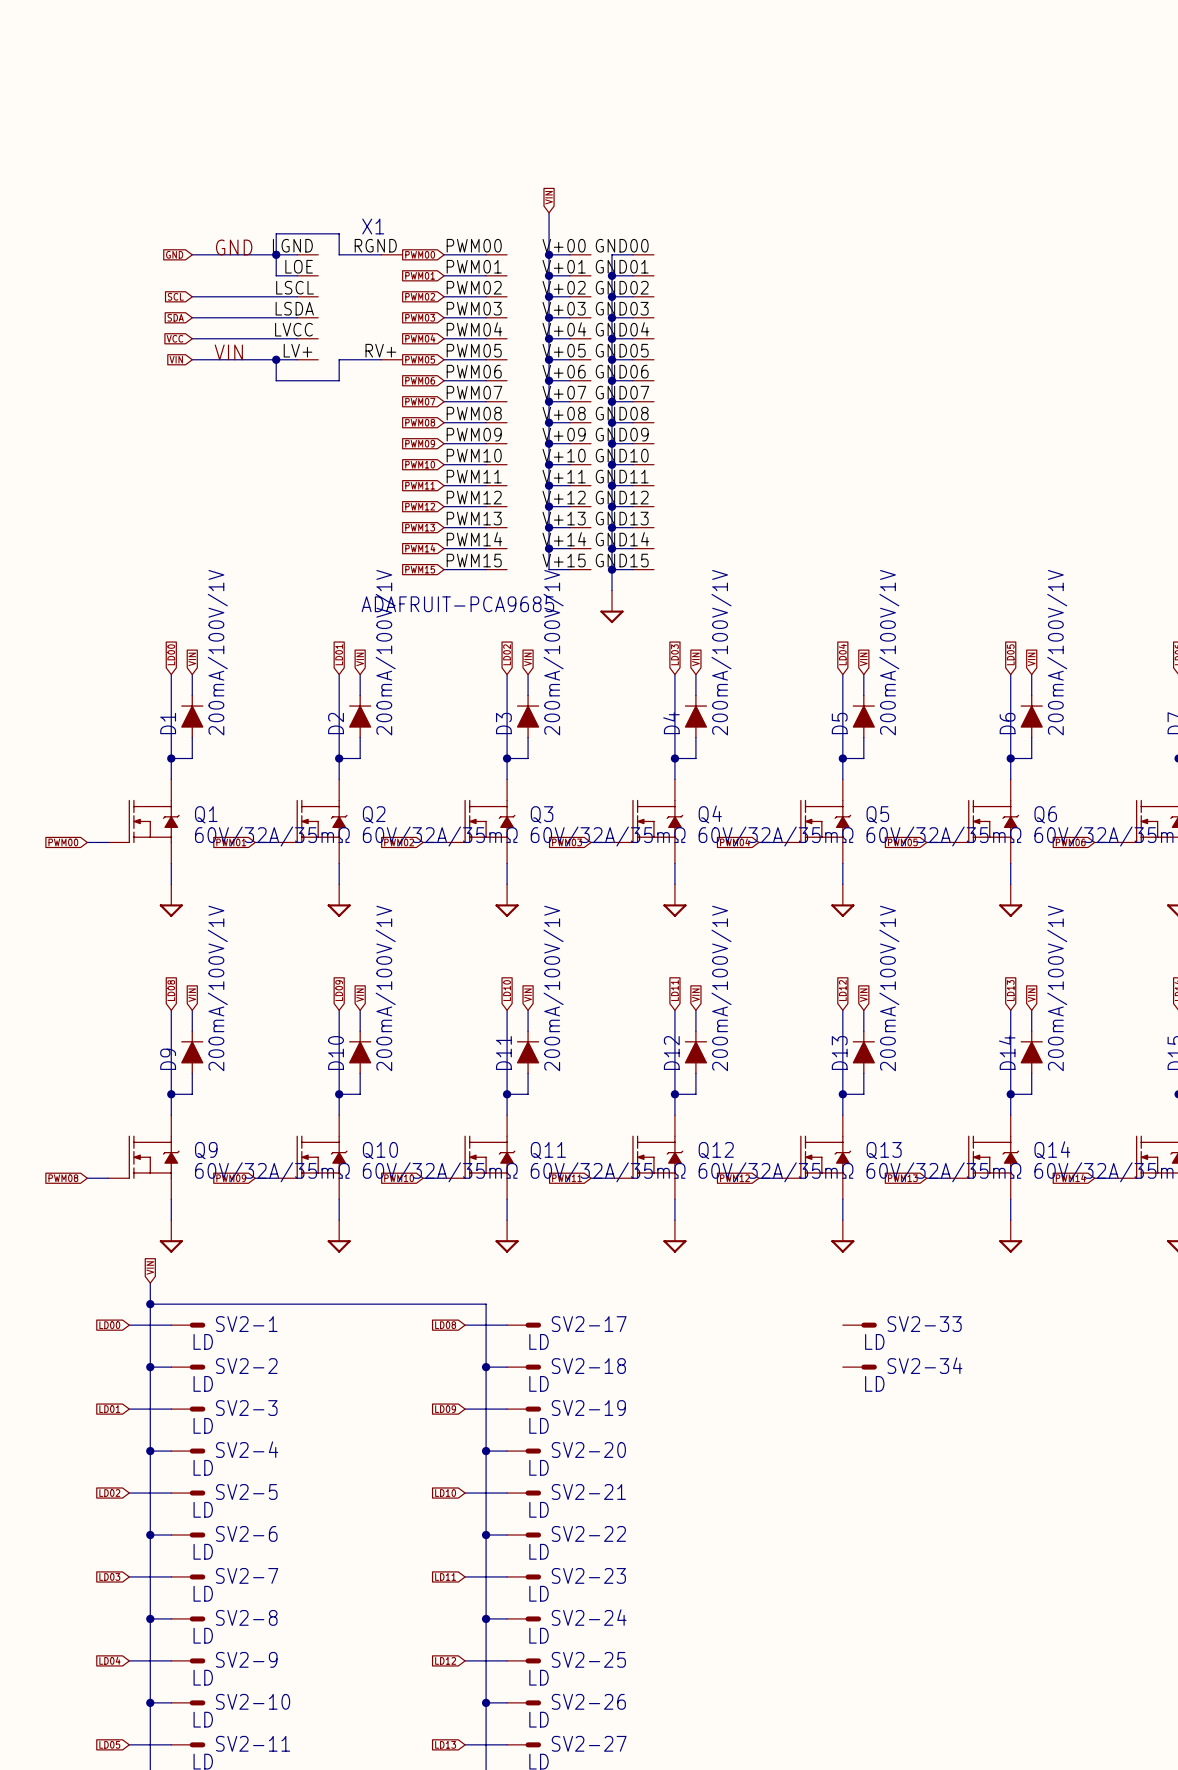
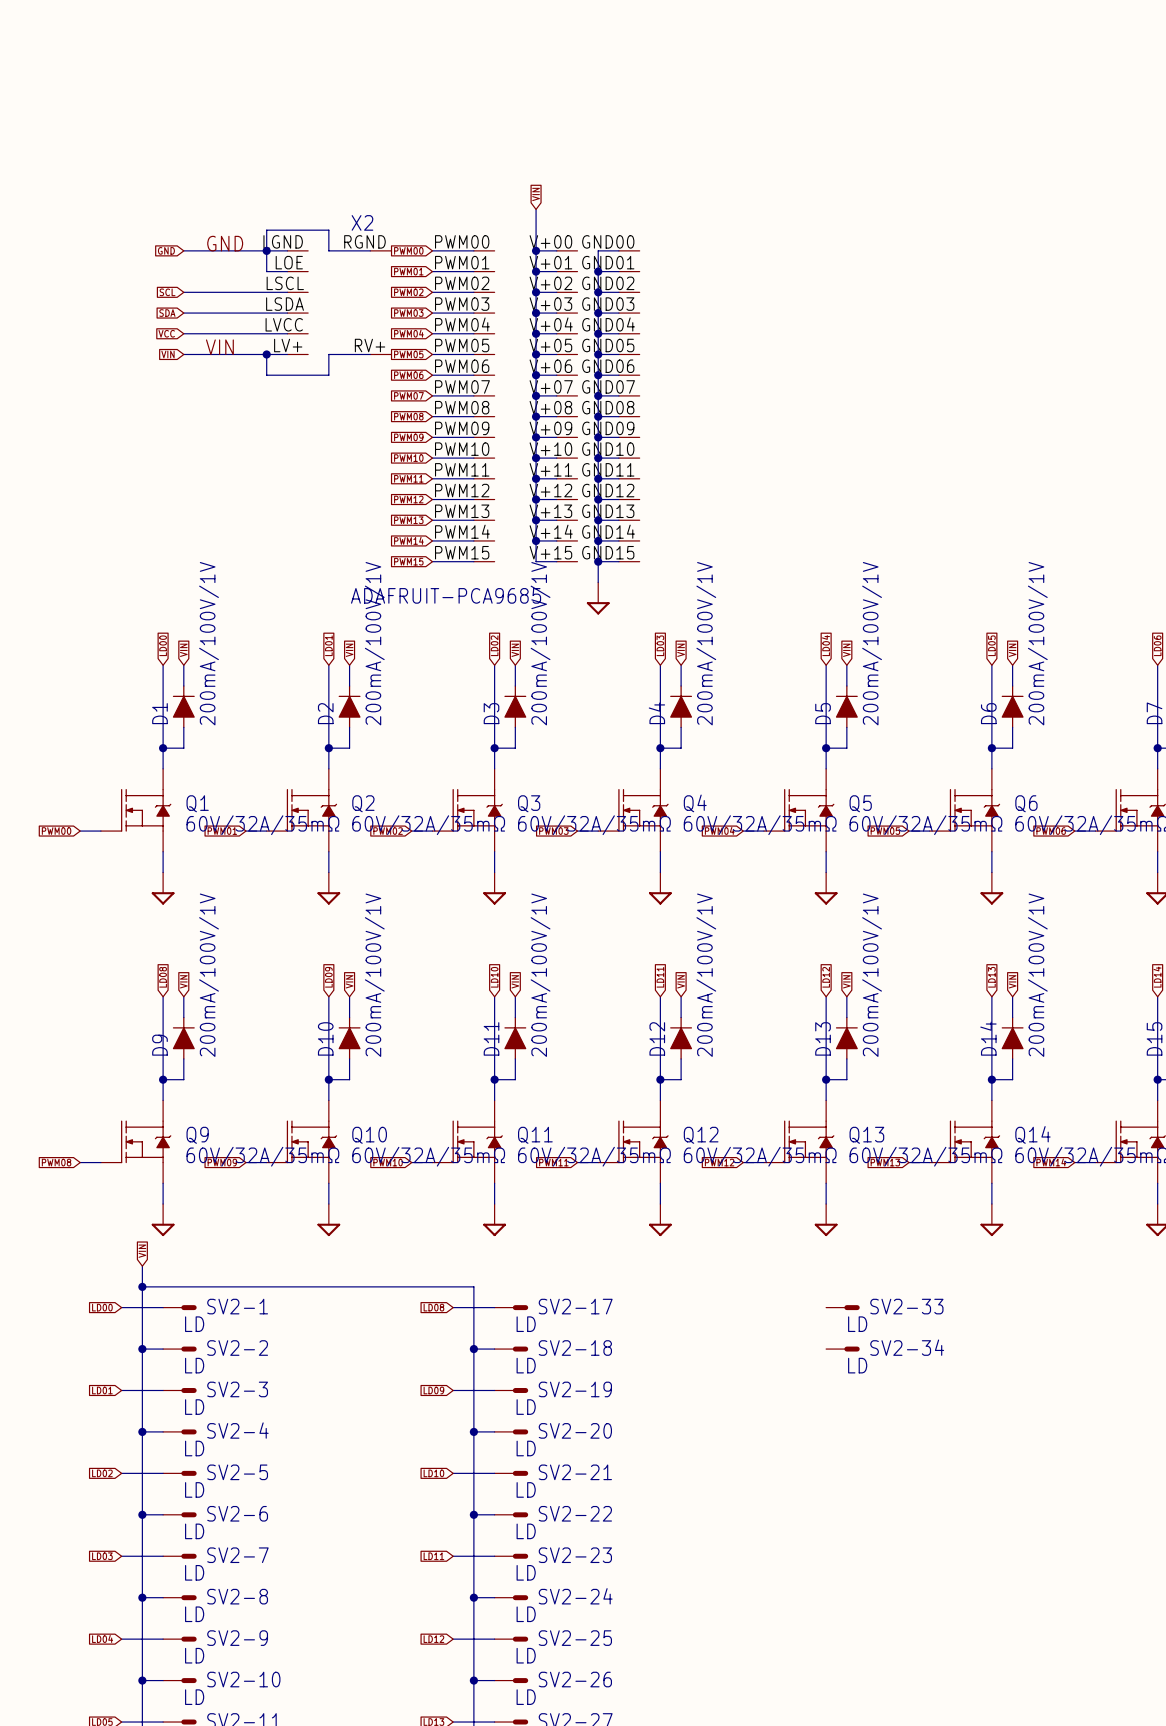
X1 name: X1 (373, 226) -> X2 (362, 222)

